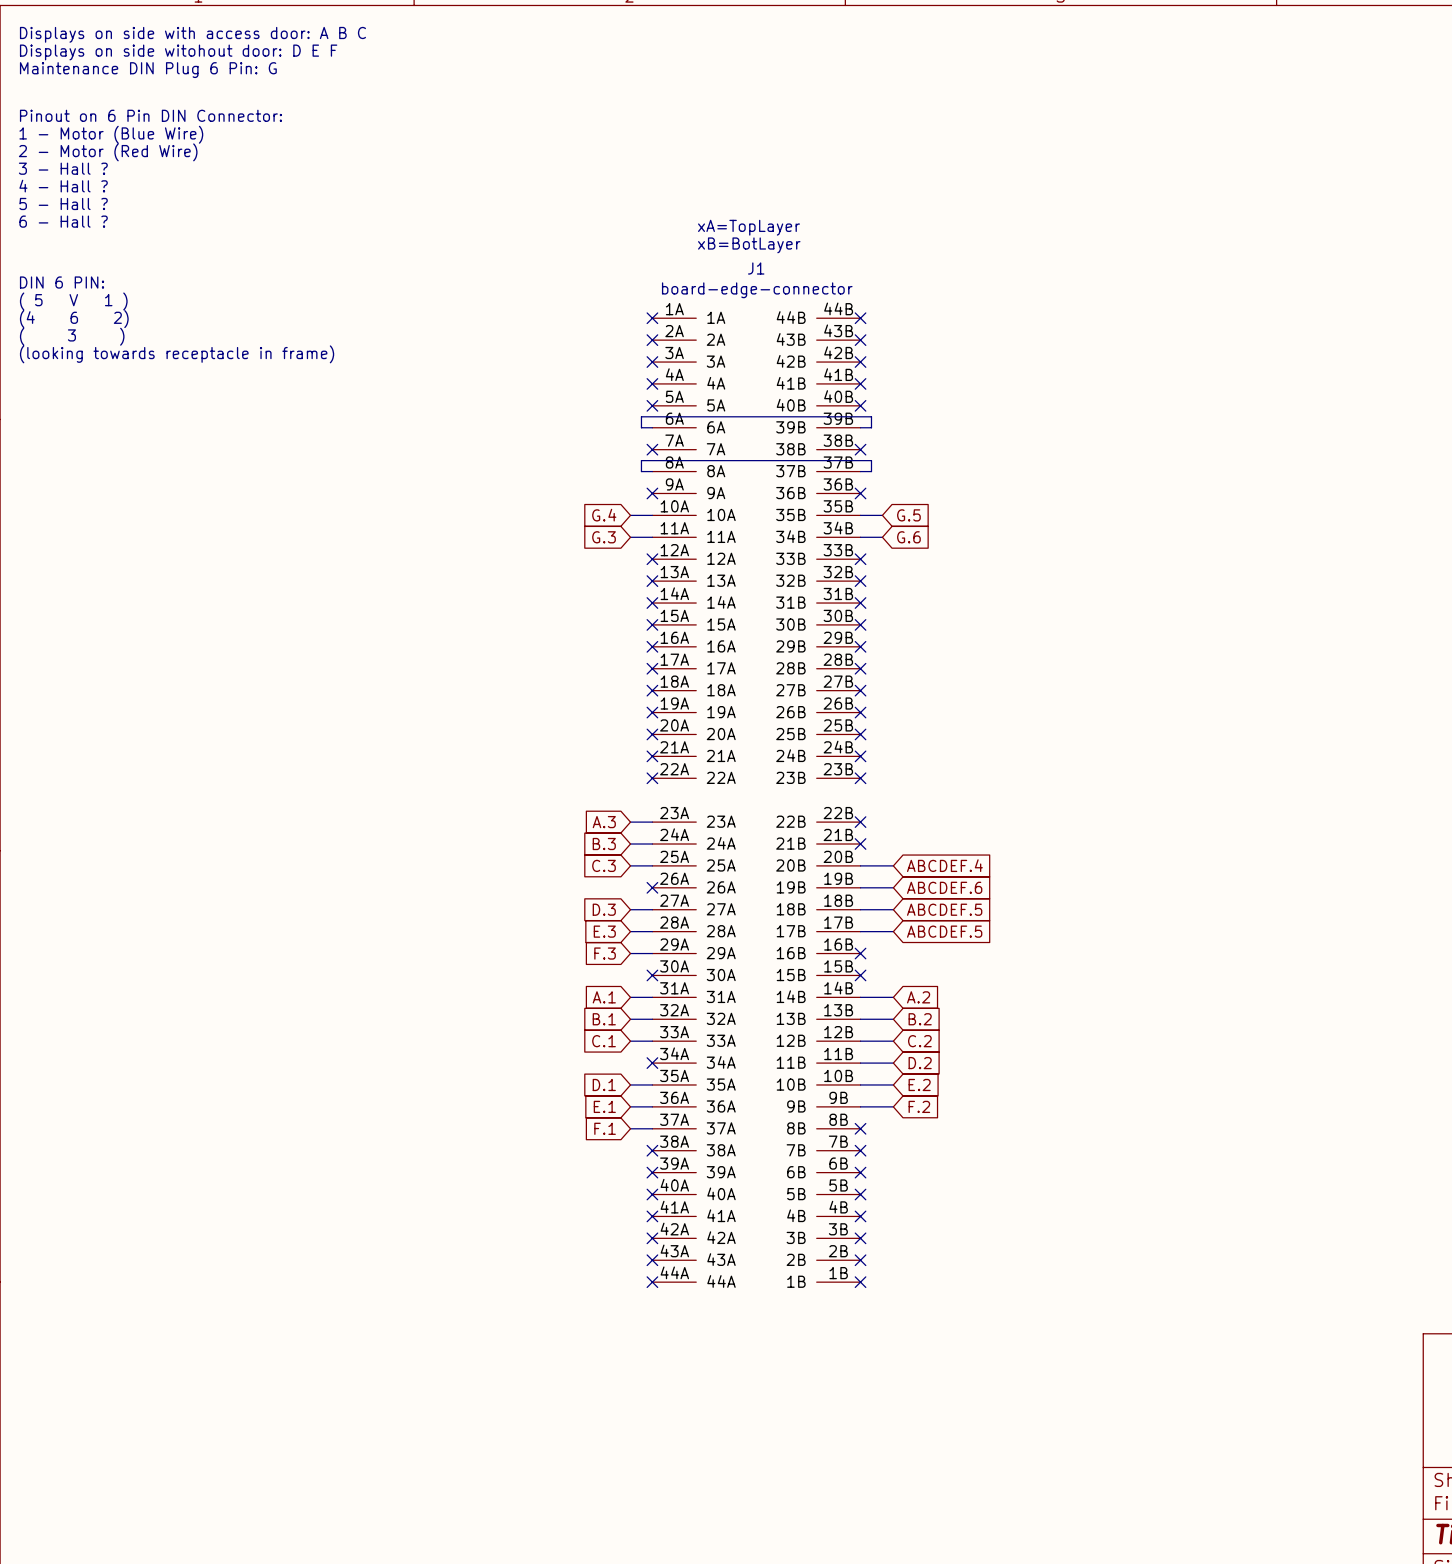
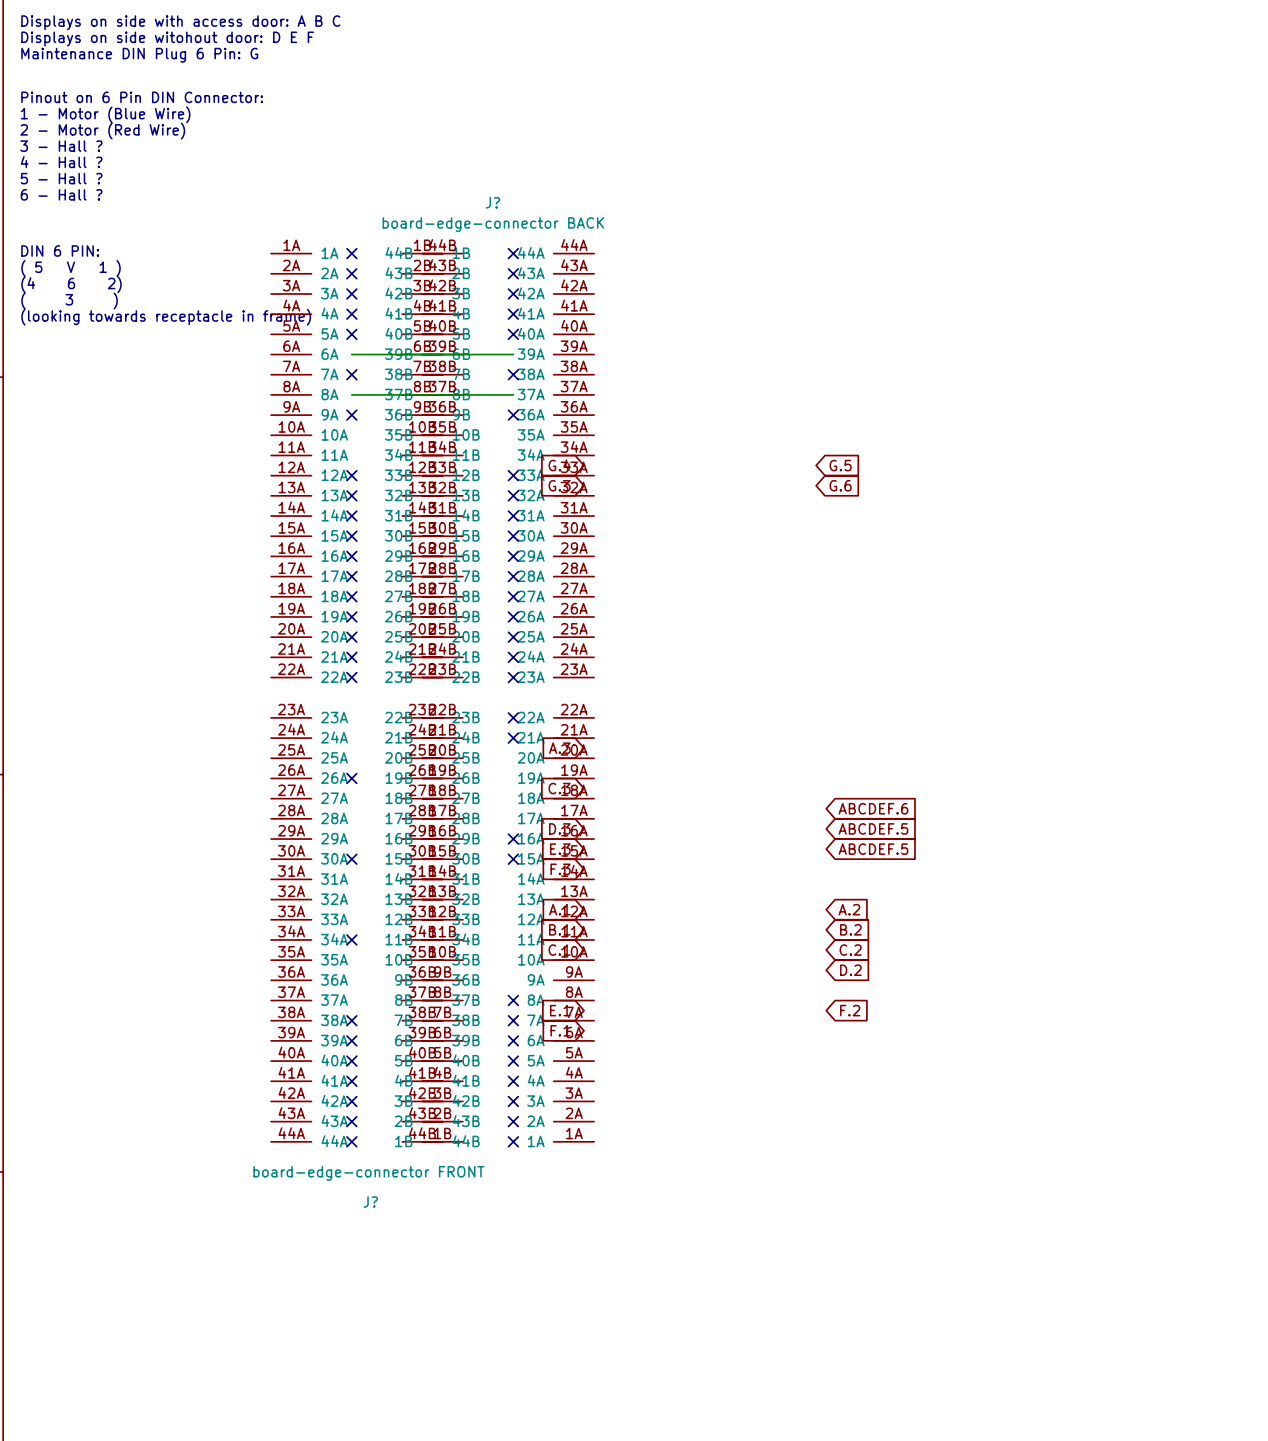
text: xA=TopLayer (748, 227) -> none
text: xB=BotLayer (749, 245) -> none
no-connect mark: none -> (351, 253)
no-connect mark: none -> (513, 253)
no-connect mark: none -> (351, 273)
no-connect mark: none -> (513, 273)
no-connect mark: (652, 318) -> none
no-connect mark: (860, 318) -> none
no-connect mark: none -> (351, 293)
no-connect mark: none -> (513, 293)
no-connect mark: (652, 340) -> none
no-connect mark: (860, 340) -> none
no-connect mark: none -> (351, 314)
no-connect mark: none -> (513, 314)
no-connect mark: (652, 362) -> none
no-connect mark: (860, 362) -> none
no-connect mark: none -> (351, 334)
no-connect mark: none -> (513, 334)
no-connect mark: (652, 383) -> none
no-connect mark: (860, 383) -> none
wire: none -> (351, 354) (513, 354)
no-connect mark: (652, 405) -> none
no-connect mark: (860, 405) -> none
no-connect mark: none -> (351, 374)
no-connect mark: none -> (513, 374)
wire: (652, 427) (641, 427) (641, 416) (871, 416) (871, 427) (860, 427) -> none
wire: none -> (351, 394) (513, 394)
no-connect mark: (652, 449) -> none
no-connect mark: (860, 449) -> none
no-connect mark: none -> (351, 415)
no-connect mark: none -> (513, 415)
wire: (652, 471) (641, 471) (641, 460) (871, 460) (871, 471) (860, 471) -> none
no-connect mark: (652, 493) -> none
no-connect mark: (860, 493) -> none
wire: (630, 515) (652, 515) -> none
wire: (860, 515) (882, 515) -> none
no-connect mark: none -> (351, 475)
no-connect mark: none -> (513, 475)
wire: (630, 537) (652, 537) -> none
wire: (860, 537) (882, 537) -> none
no-connect mark: none -> (351, 495)
no-connect mark: none -> (513, 495)
no-connect mark: (652, 559) -> none
no-connect mark: (860, 559) -> none
no-connect mark: none -> (351, 516)
no-connect mark: none -> (513, 516)
no-connect mark: (652, 581) -> none
no-connect mark: (860, 581) -> none
no-connect mark: none -> (351, 536)
no-connect mark: none -> (513, 536)
no-connect mark: (652, 603) -> none
no-connect mark: (860, 603) -> none
no-connect mark: none -> (351, 556)
no-connect mark: none -> (513, 556)
no-connect mark: (652, 624) -> none
no-connect mark: (860, 624) -> none
no-connect mark: none -> (351, 576)
no-connect mark: none -> (513, 576)
no-connect mark: (652, 646) -> none
no-connect mark: (860, 646) -> none
no-connect mark: none -> (351, 596)
no-connect mark: none -> (513, 596)
no-connect mark: (652, 668) -> none
no-connect mark: (860, 668) -> none
no-connect mark: none -> (351, 616)
no-connect mark: none -> (513, 616)
no-connect mark: (652, 690) -> none
no-connect mark: (860, 690) -> none
no-connect mark: none -> (351, 637)
no-connect mark: none -> (513, 637)
no-connect mark: (652, 712) -> none
no-connect mark: (860, 712) -> none
no-connect mark: none -> (351, 657)
no-connect mark: none -> (513, 657)
no-connect mark: (652, 734) -> none
no-connect mark: (860, 734) -> none
no-connect mark: none -> (351, 677)
no-connect mark: none -> (513, 677)
no-connect mark: (652, 756) -> none
no-connect mark: (860, 756) -> none
J?: none -> board-edge-connector FRONT (367, 697)
J?: none -> board-edge-connector BACK (498, 697)
no-connect mark: (652, 778) -> none
no-connect mark: (860, 778) -> none
no-connect mark: none -> (513, 717)
J1: board-edge-connector (756, 800) -> none
no-connect mark: none -> (513, 738)
wire: (630, 822) (652, 822) -> none
no-connect mark: (860, 822) -> none
global label: B.3 (604, 844) -> none
wire: (630, 844) (652, 844) -> none
no-connect mark: (860, 844) -> none
no-connect mark: none -> (351, 778)
wire: (630, 865) (652, 865) -> none
wire: (860, 865) (893, 865) -> none
global label: ABCDEF.4 (944, 865) -> none
no-connect mark: (652, 887) -> none
wire: (860, 887) (893, 887) -> none
wire: (630, 909) (652, 909) -> none
wire: (860, 909) (893, 909) -> none
no-connect mark: none -> (513, 839)
wire: (630, 931) (652, 931) -> none
wire: (860, 931) (893, 931) -> none
no-connect mark: none -> (351, 859)
no-connect mark: none -> (513, 859)
wire: (630, 953) (652, 953) -> none
no-connect mark: (860, 953) -> none
no-connect mark: (652, 975) -> none
no-connect mark: (860, 975) -> none
wire: (630, 997) (652, 997) -> none
wire: (860, 997) (893, 997) -> none
wire: (630, 1019) (652, 1019) -> none
wire: (860, 1019) (893, 1019) -> none
no-connect mark: none -> (351, 939)
wire: (630, 1041) (652, 1041) -> none
wire: (860, 1041) (893, 1041) -> none
no-connect mark: (652, 1063) -> none
wire: (860, 1063) (893, 1063) -> none
global label: D.1 (604, 1084) -> none
wire: (630, 1084) (652, 1084) -> none
wire: (860, 1084) (893, 1084) -> none
global label: E.2 (919, 1084) -> none
no-connect mark: none -> (513, 1000)
wire: (630, 1106) (652, 1106) -> none
wire: (860, 1106) (893, 1106) -> none
no-connect mark: none -> (351, 1020)
no-connect mark: none -> (513, 1020)
wire: (630, 1128) (652, 1128) -> none
no-connect mark: (860, 1128) -> none
no-connect mark: none -> (351, 1040)
no-connect mark: none -> (513, 1040)
no-connect mark: (652, 1150) -> none
no-connect mark: (860, 1150) -> none
no-connect mark: none -> (351, 1061)
no-connect mark: none -> (513, 1061)
no-connect mark: (652, 1172) -> none
no-connect mark: (860, 1172) -> none
no-connect mark: none -> (351, 1081)
no-connect mark: none -> (513, 1081)
no-connect mark: (652, 1194) -> none
no-connect mark: (860, 1194) -> none
no-connect mark: none -> (351, 1101)
no-connect mark: none -> (513, 1101)
no-connect mark: (652, 1216) -> none
no-connect mark: (860, 1216) -> none
no-connect mark: none -> (351, 1121)
no-connect mark: none -> (513, 1121)
no-connect mark: (652, 1238) -> none
no-connect mark: (860, 1238) -> none
no-connect mark: none -> (351, 1141)
no-connect mark: none -> (513, 1141)
no-connect mark: (652, 1260) -> none
no-connect mark: (860, 1260) -> none
no-connect mark: (652, 1282) -> none
no-connect mark: (860, 1282) -> none

